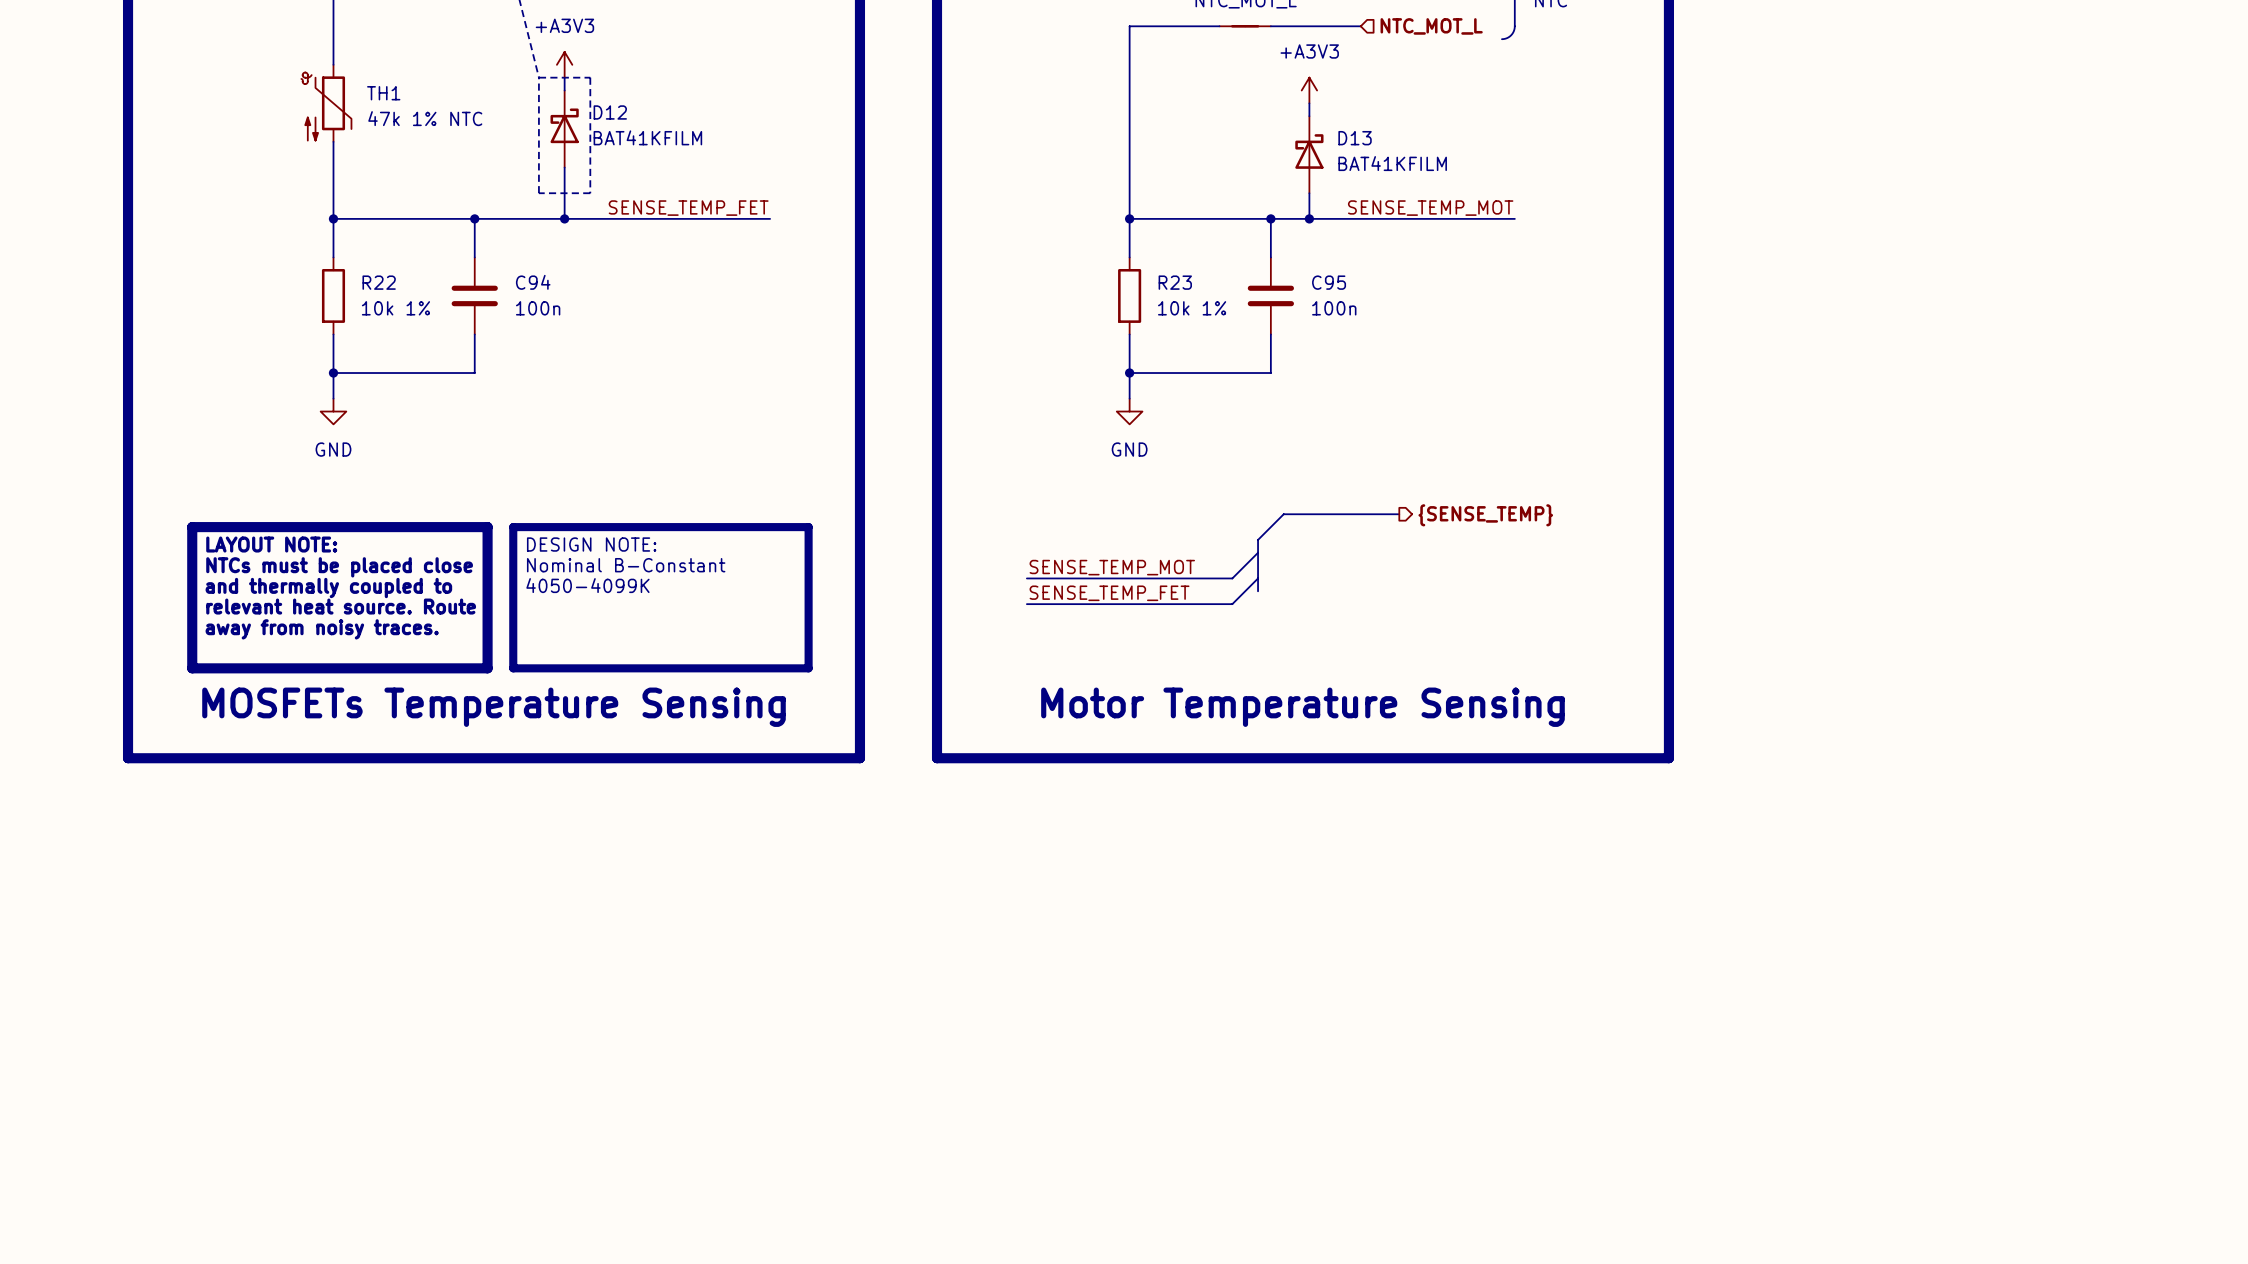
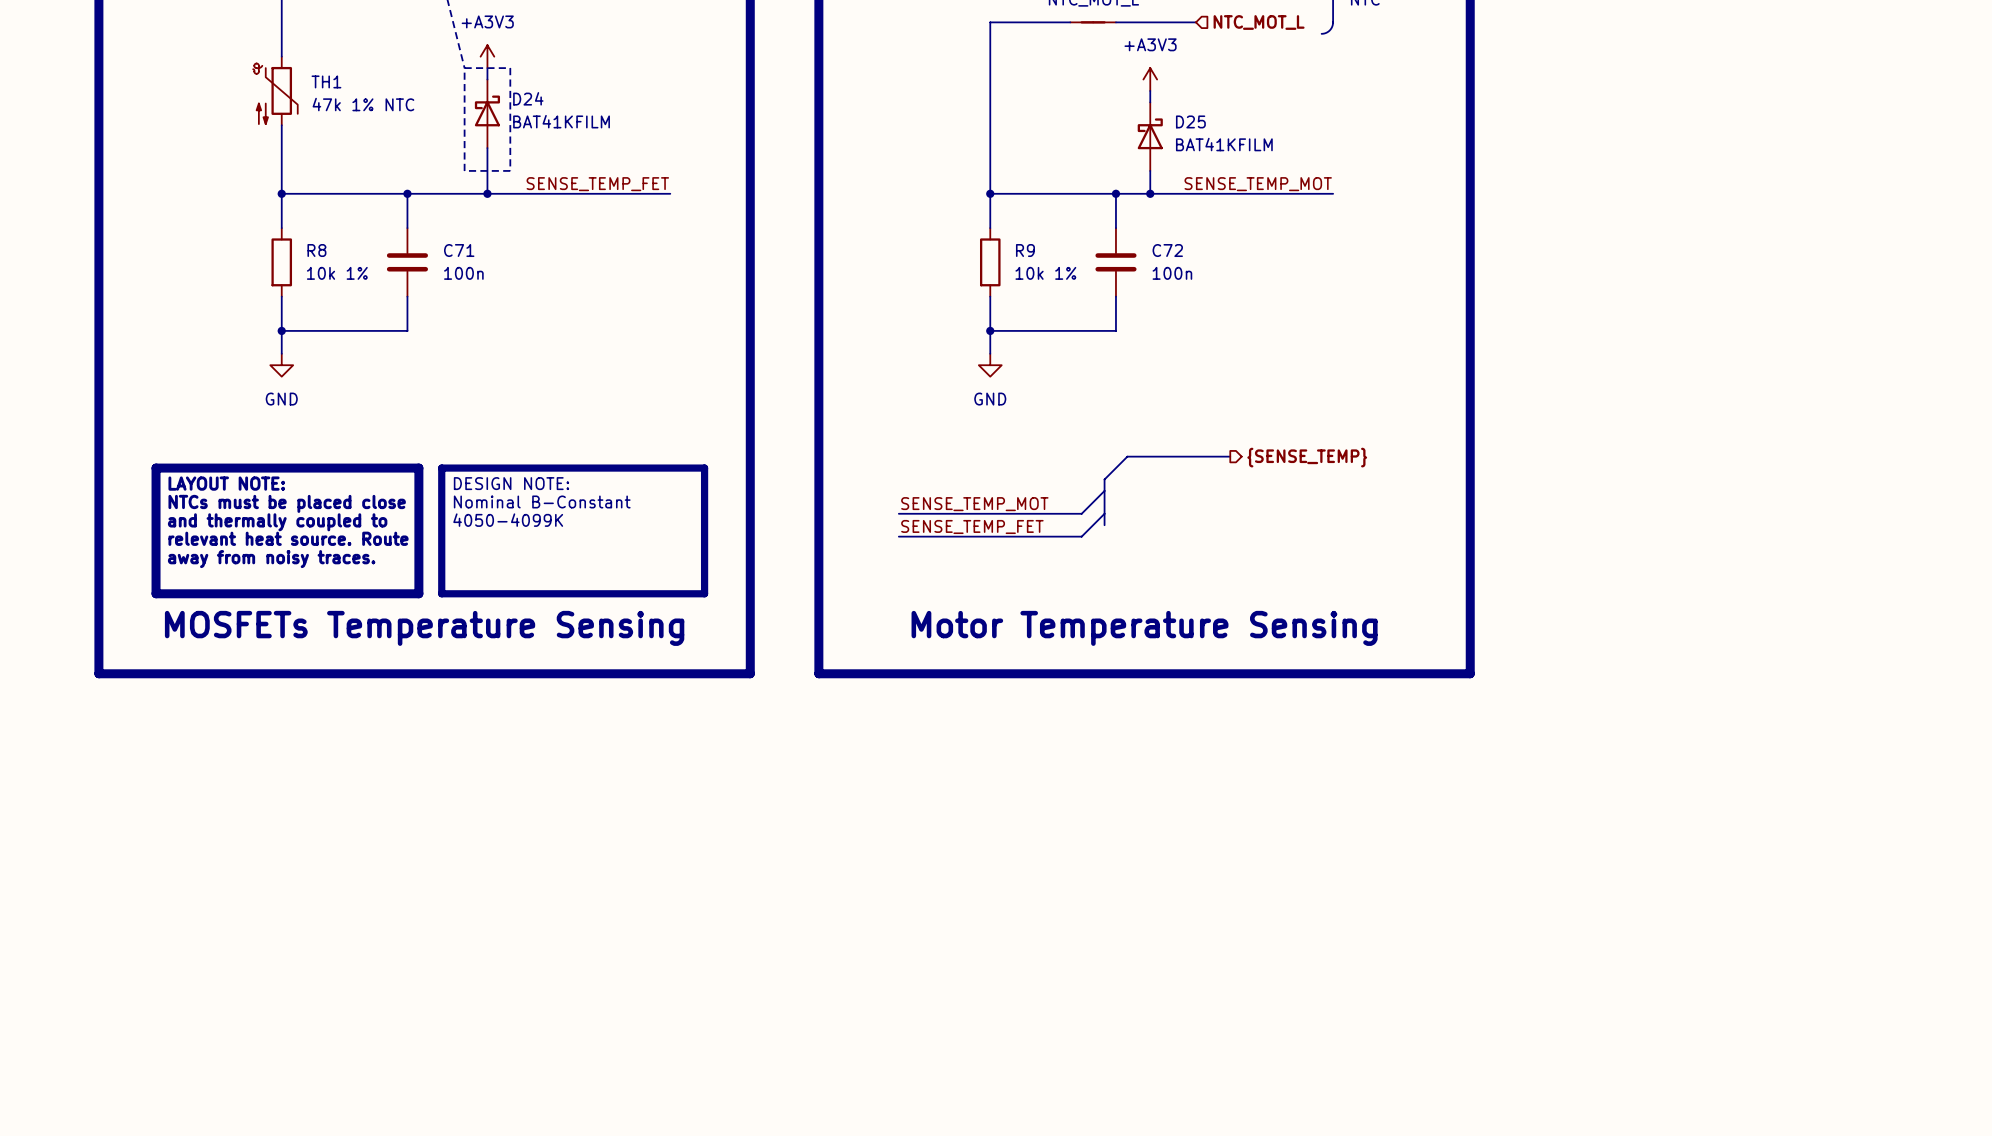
D12 name: D12 (610, 112) -> D24 (528, 98)
D13 name: D13 (1355, 138) -> D25 (1190, 121)
R22 name: R22 (379, 282) -> R8 (316, 250)
C94 name: C94 (533, 282) -> C71 (459, 250)
R23 name: R23 (1175, 282) -> R9 (1025, 250)
C95 name: C95 (1329, 282) -> C72 (1167, 250)

